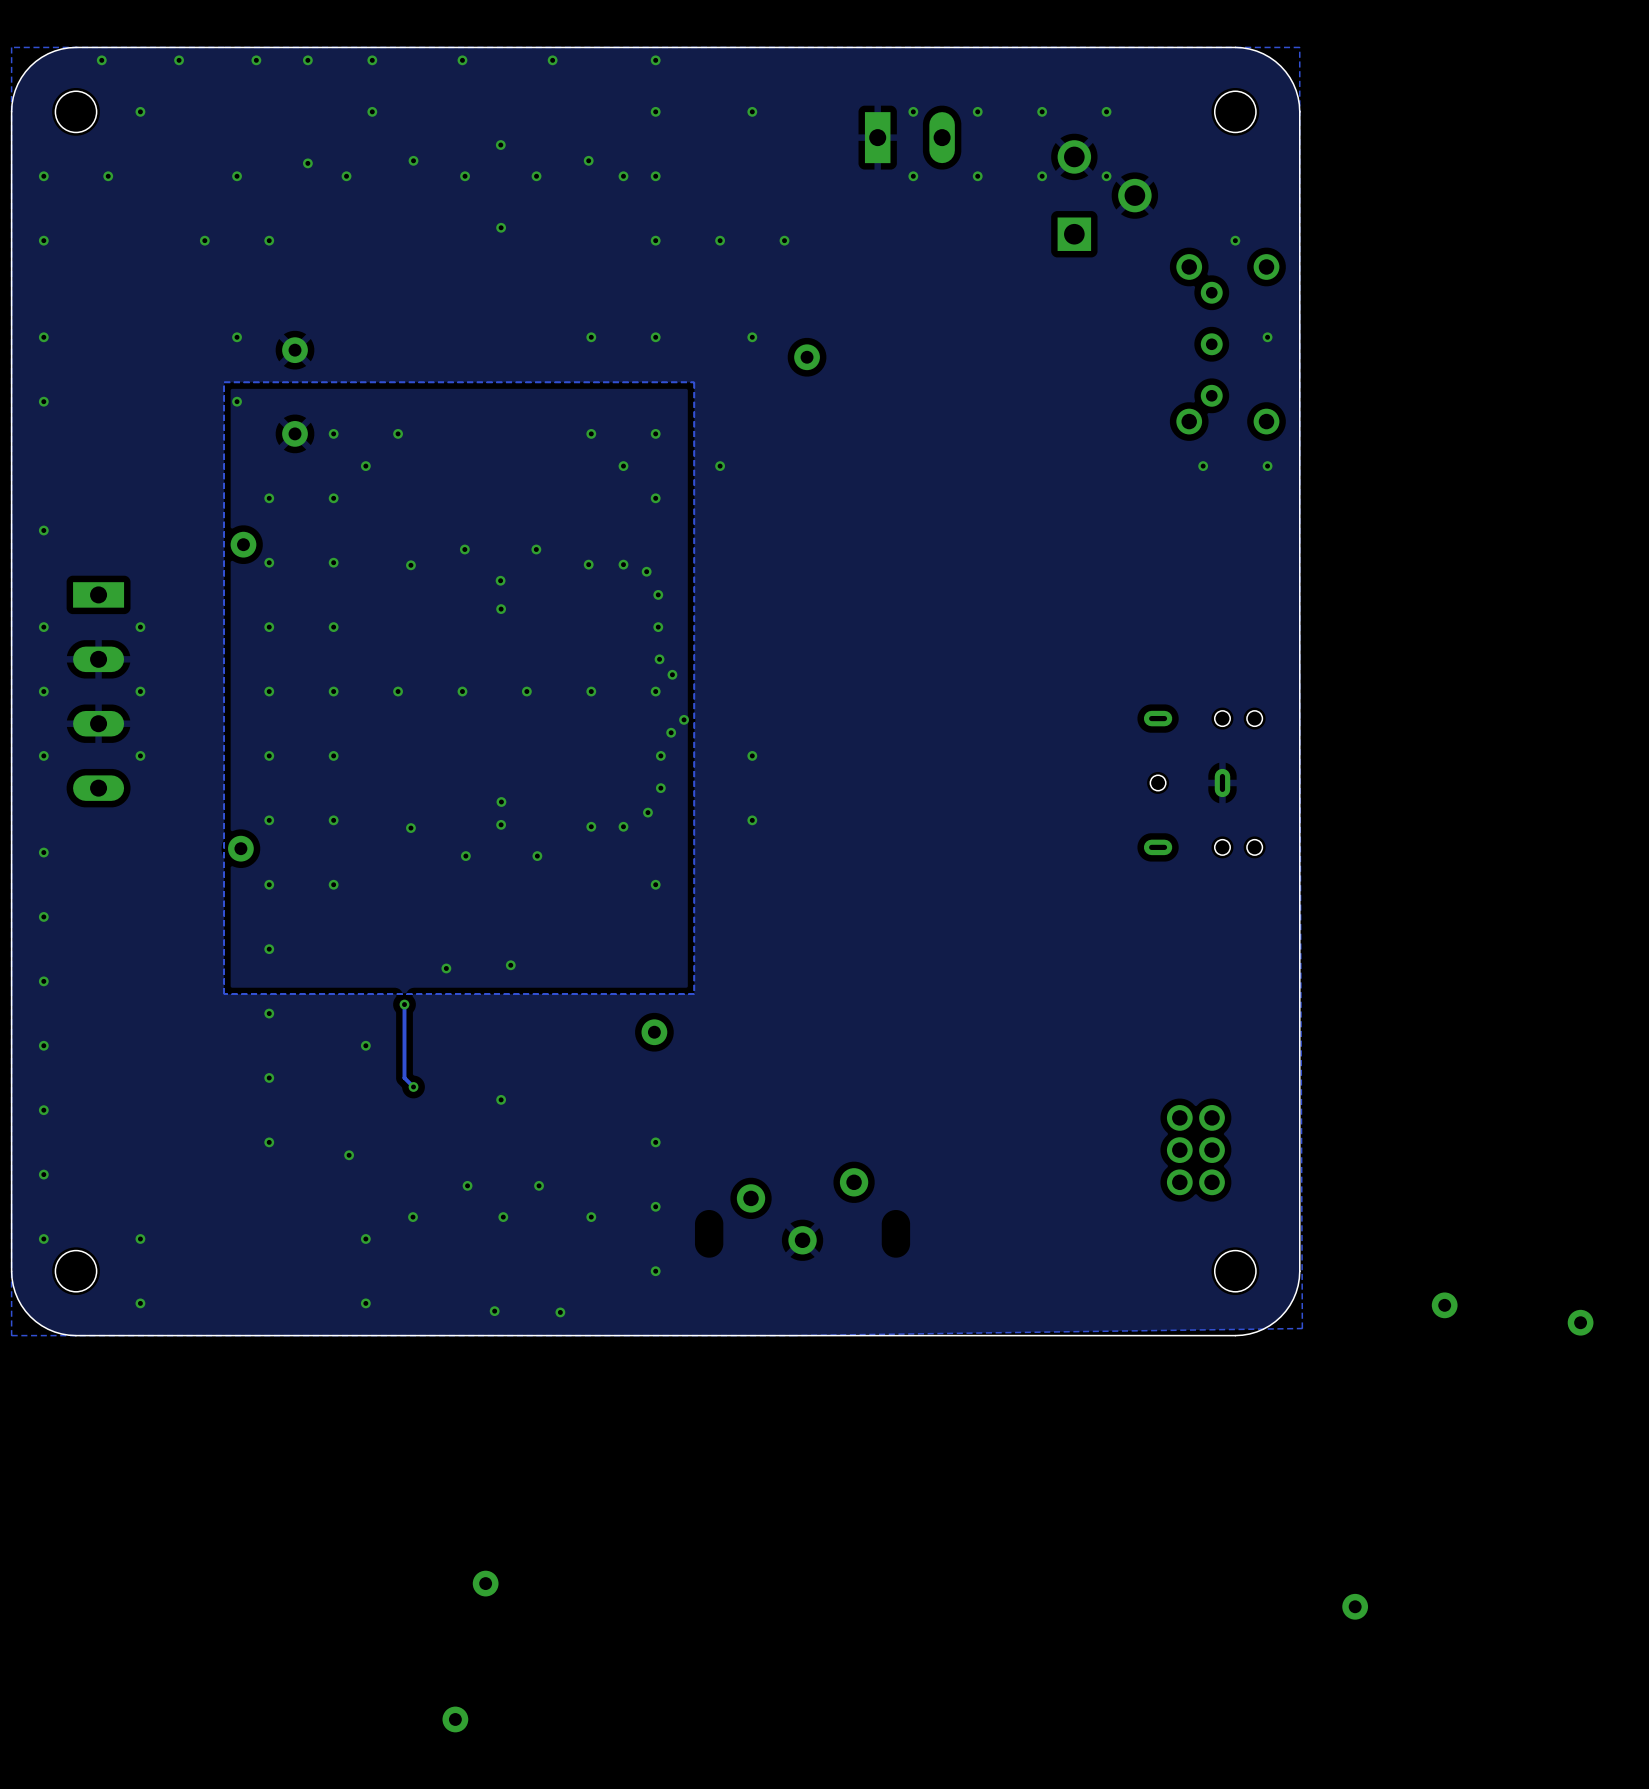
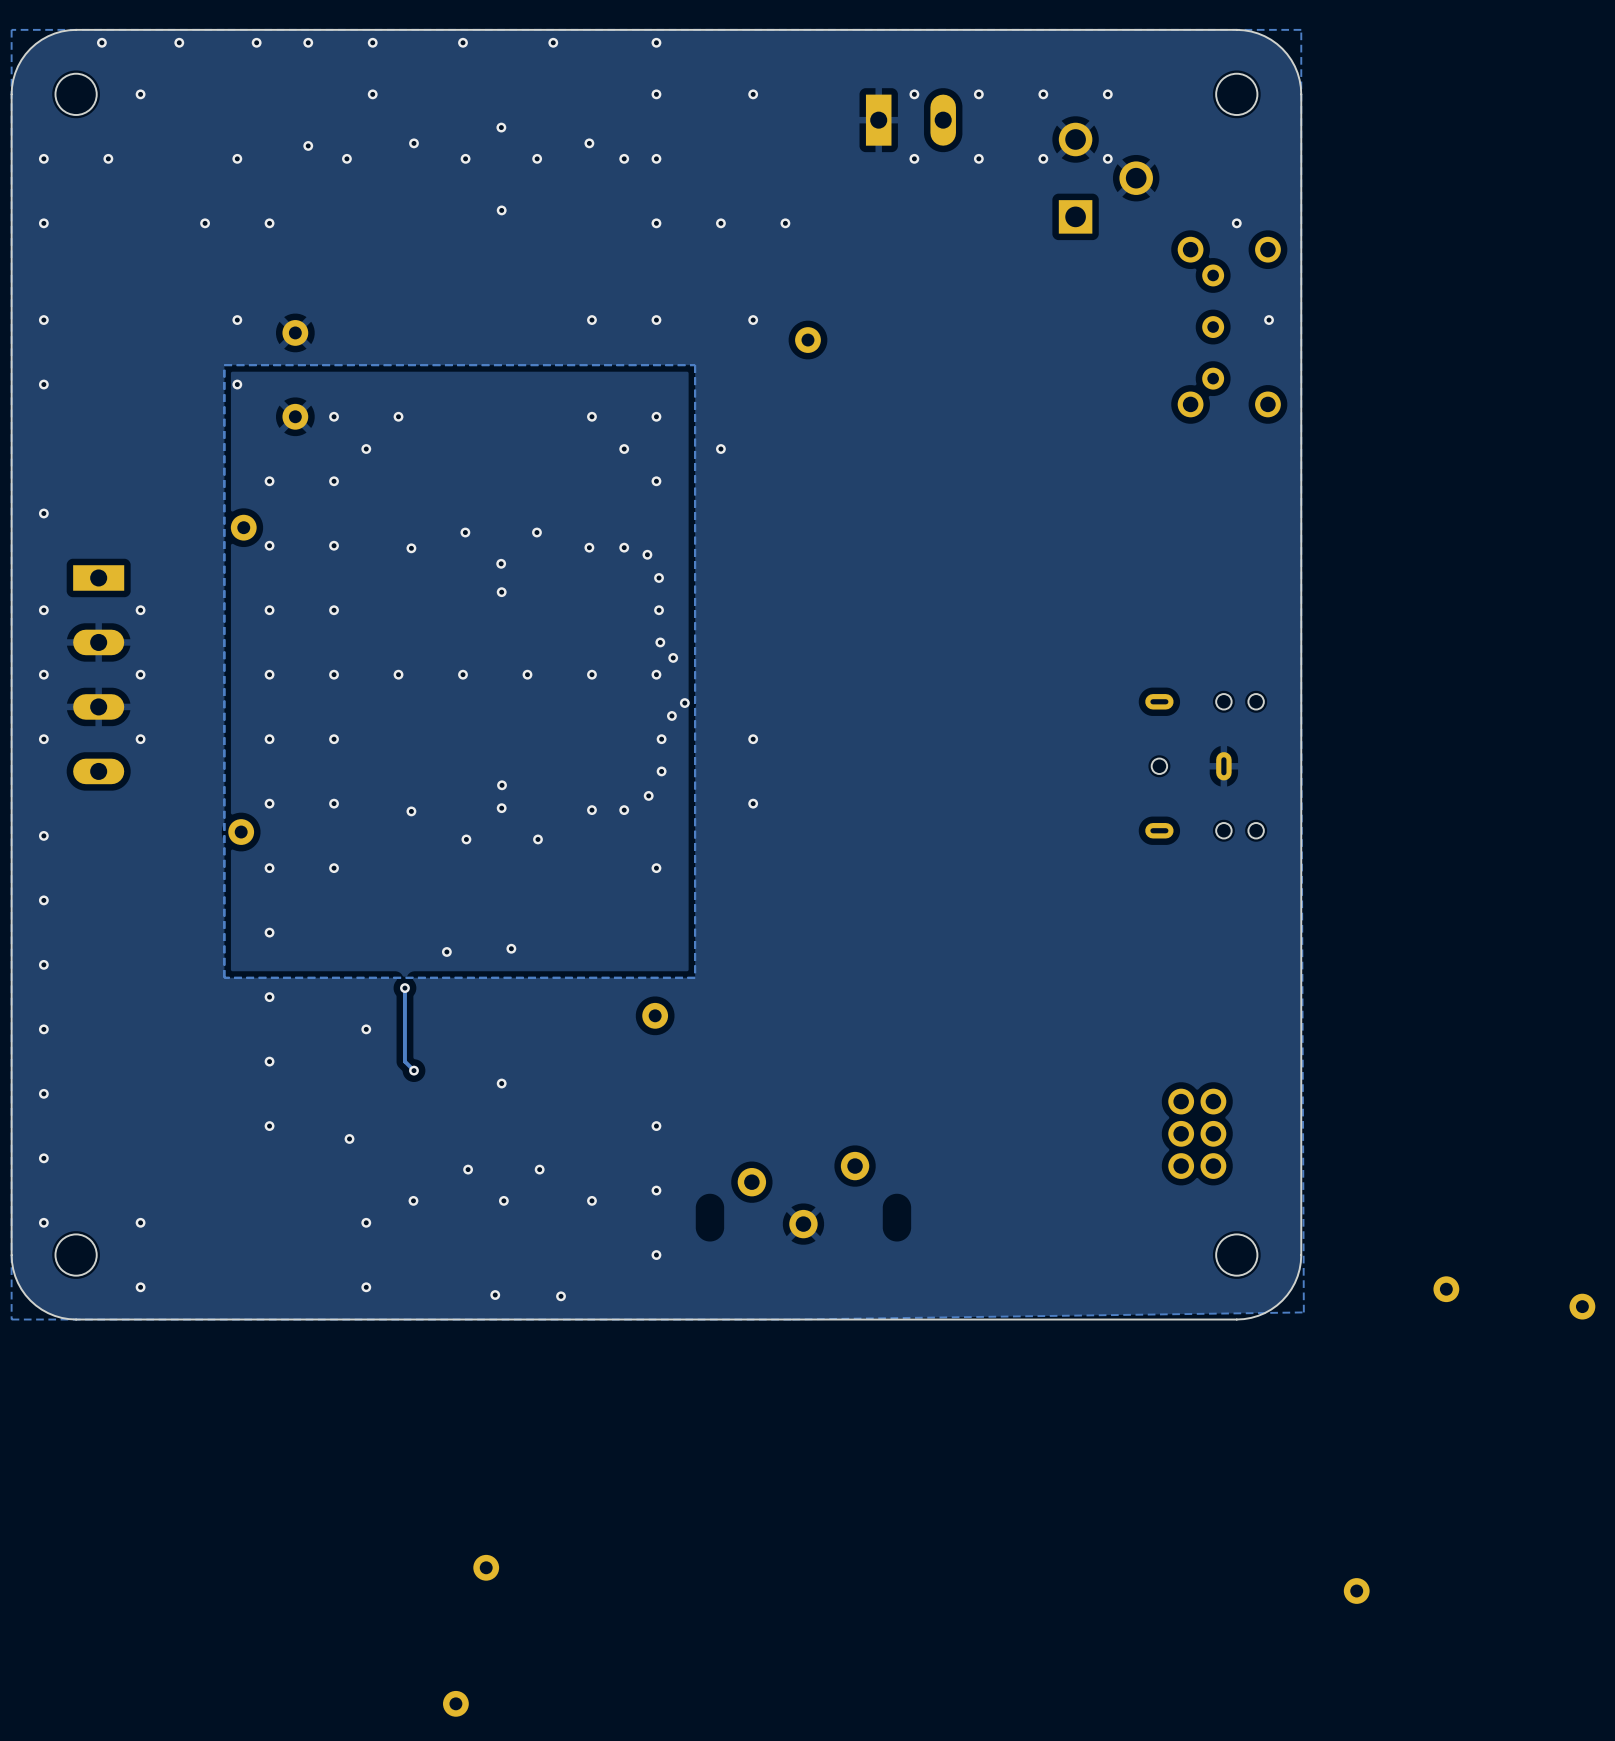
via: (1203, 466) -> none
via: (1267, 466) -> none

